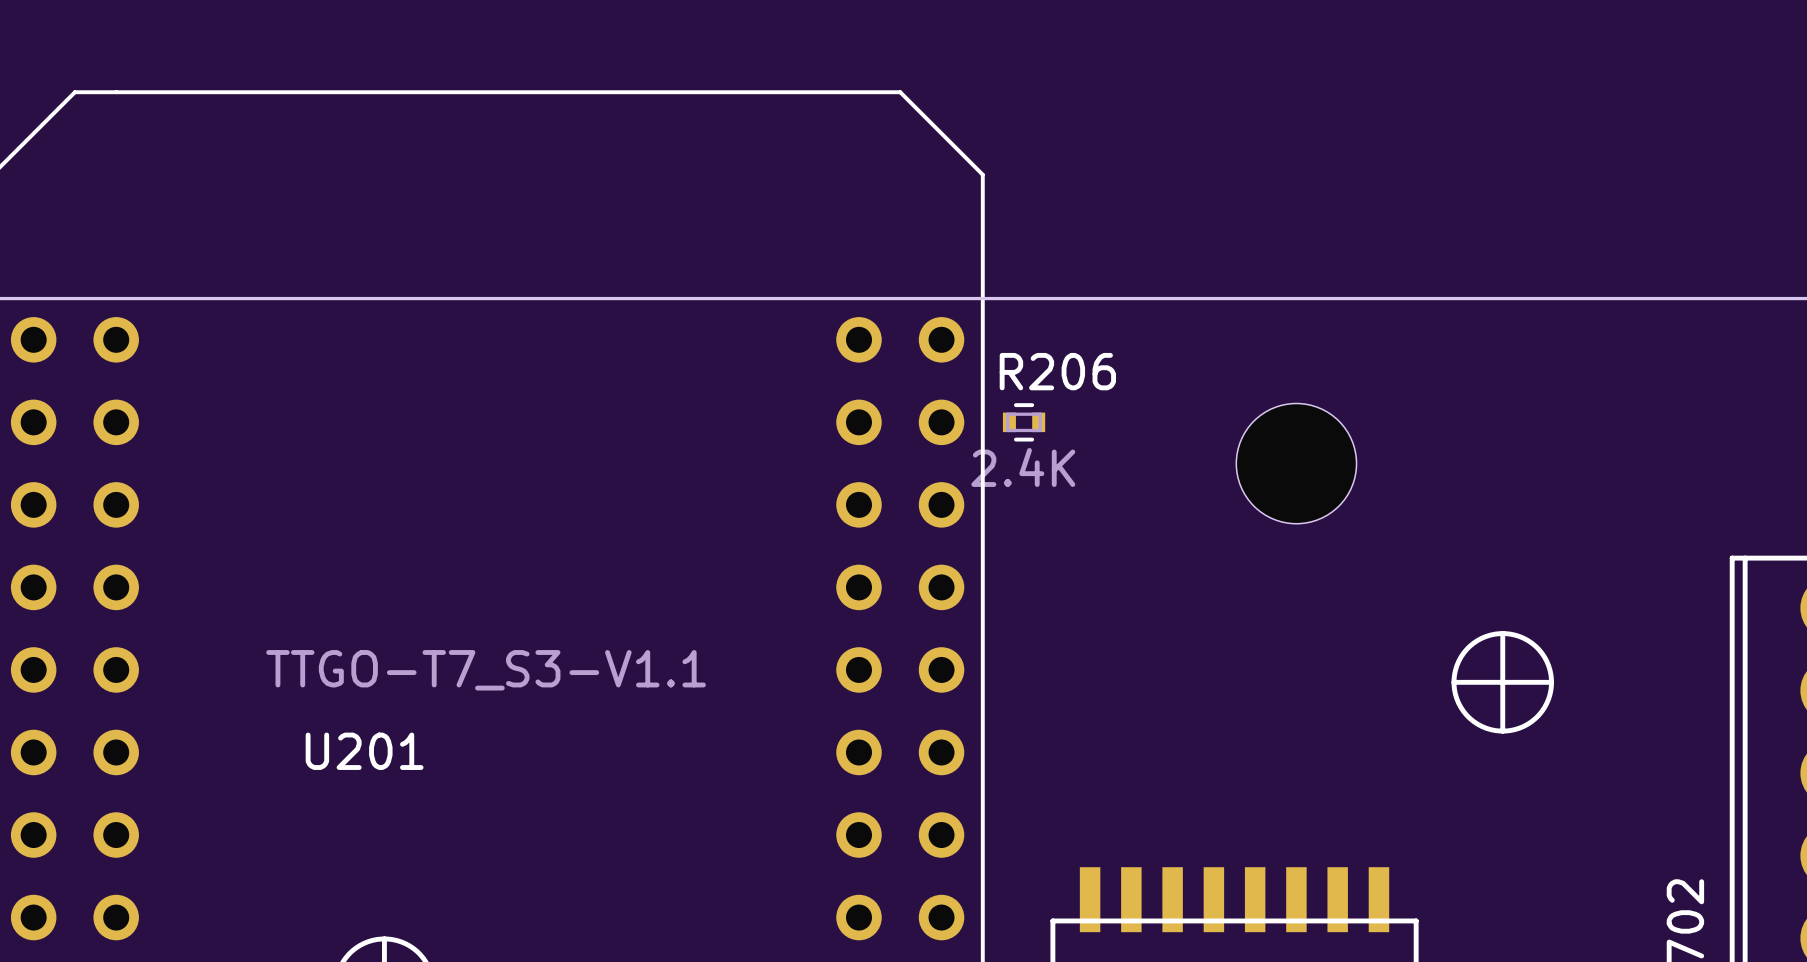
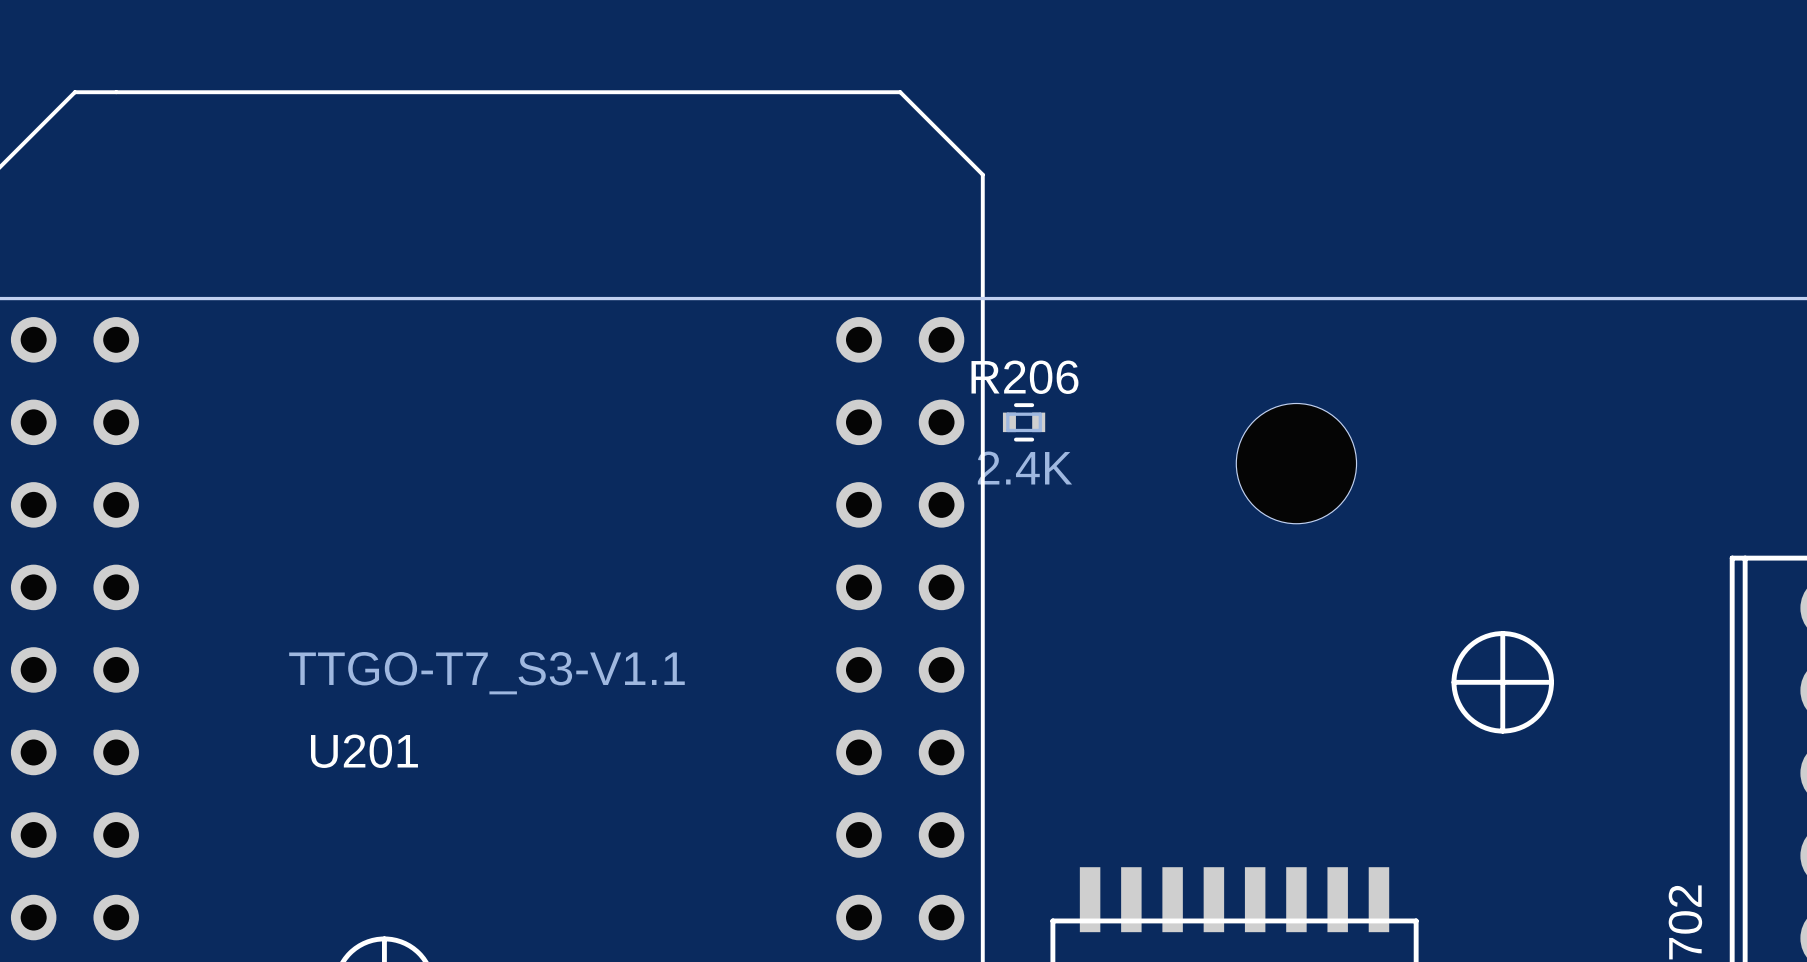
R206 name position: R206 (1057, 371) -> R206 (1024, 377)

